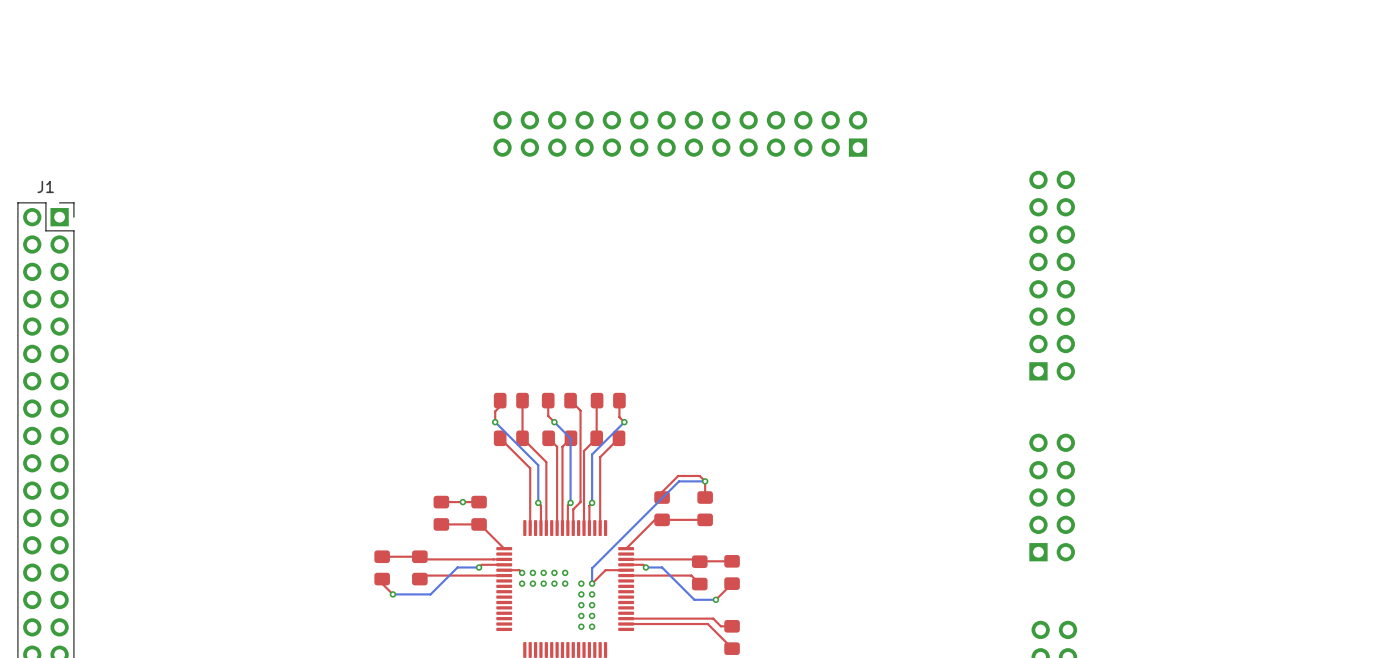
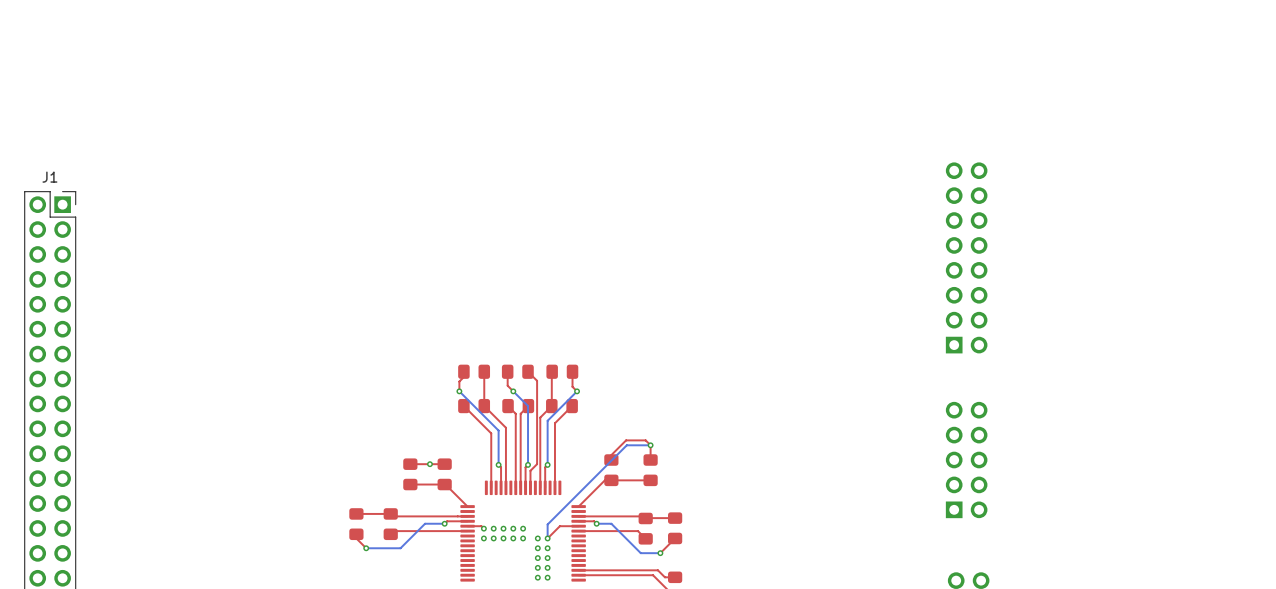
part: (680, 133) -> none

